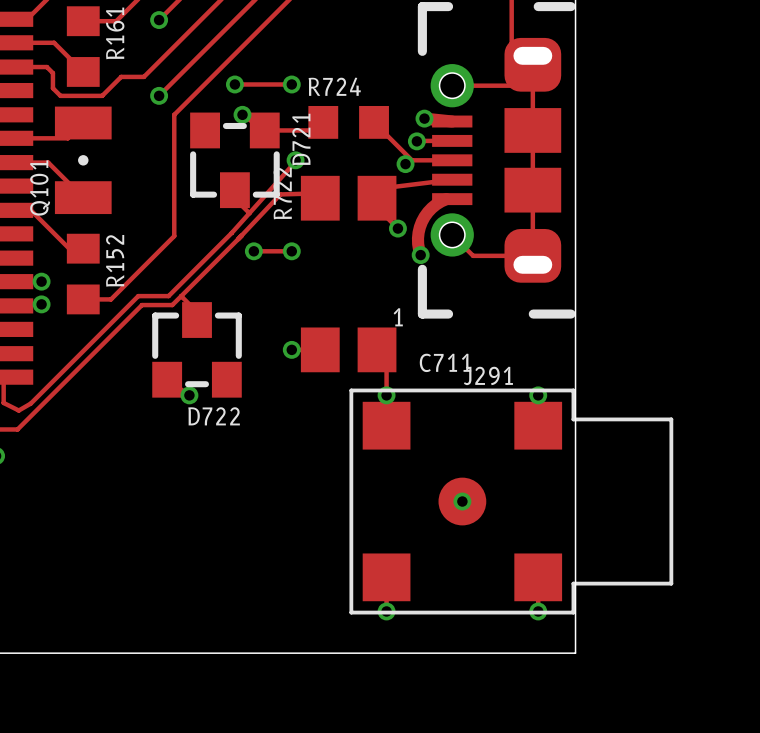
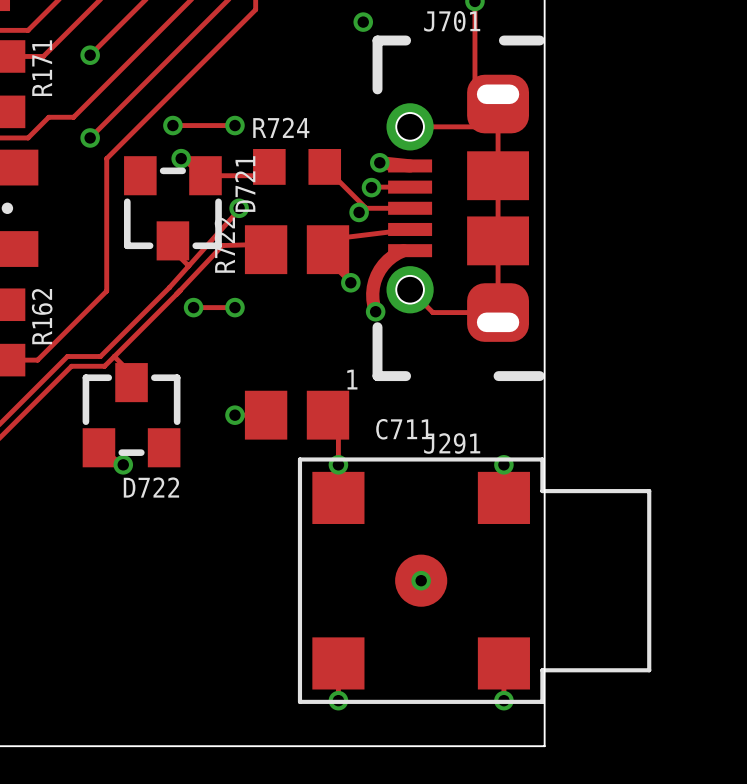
R161 name: R161 (115, 33) -> R171 (42, 68)
R152 name: R152 (115, 260) -> R162 (42, 316)

